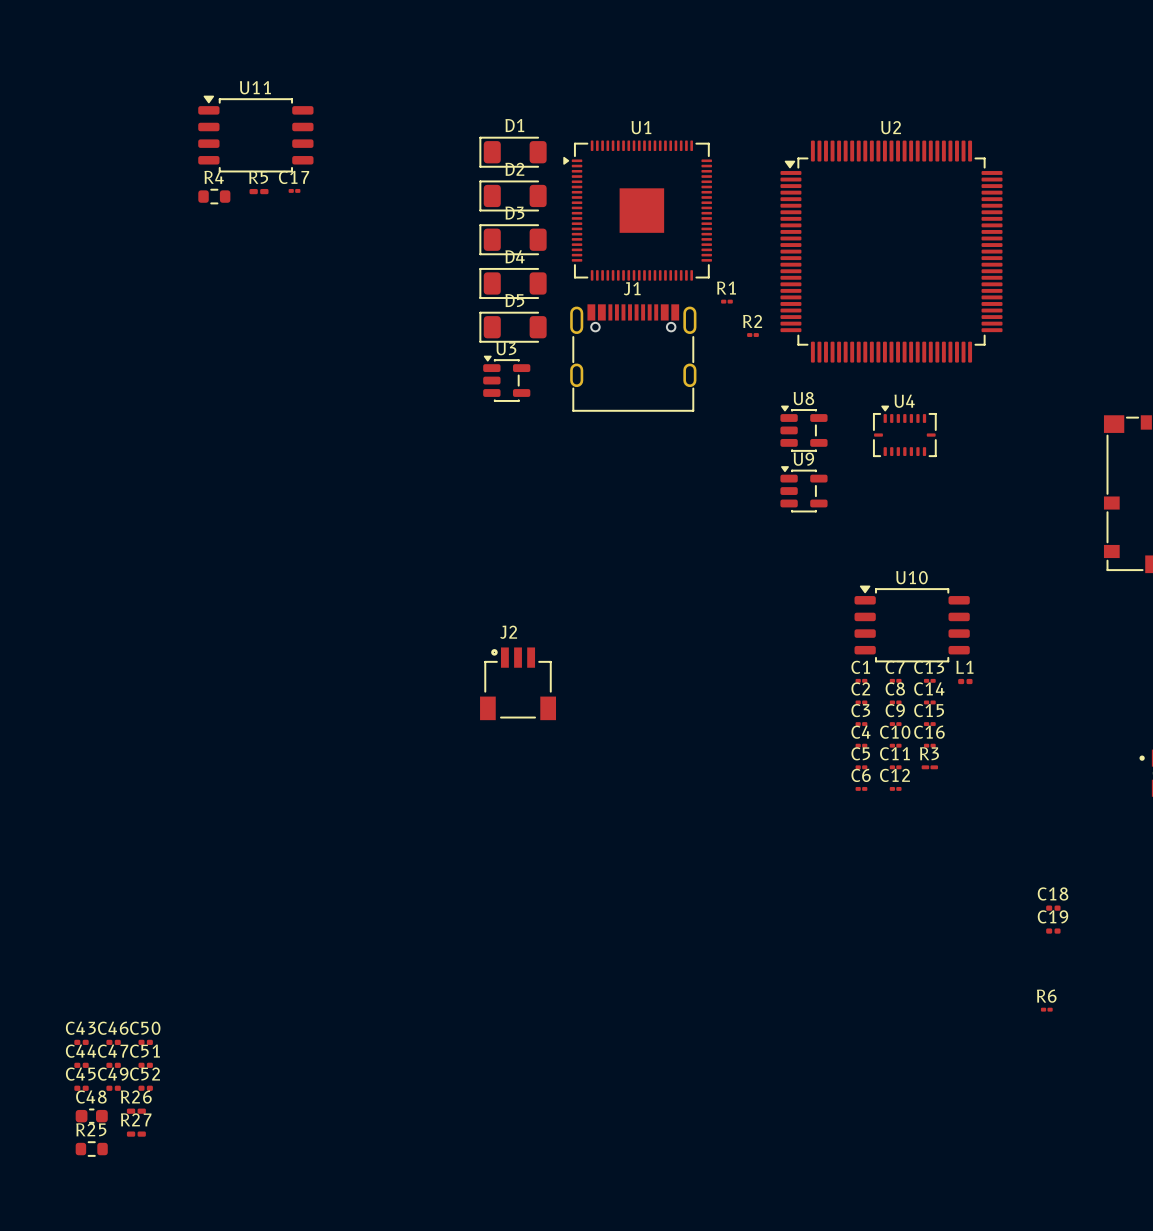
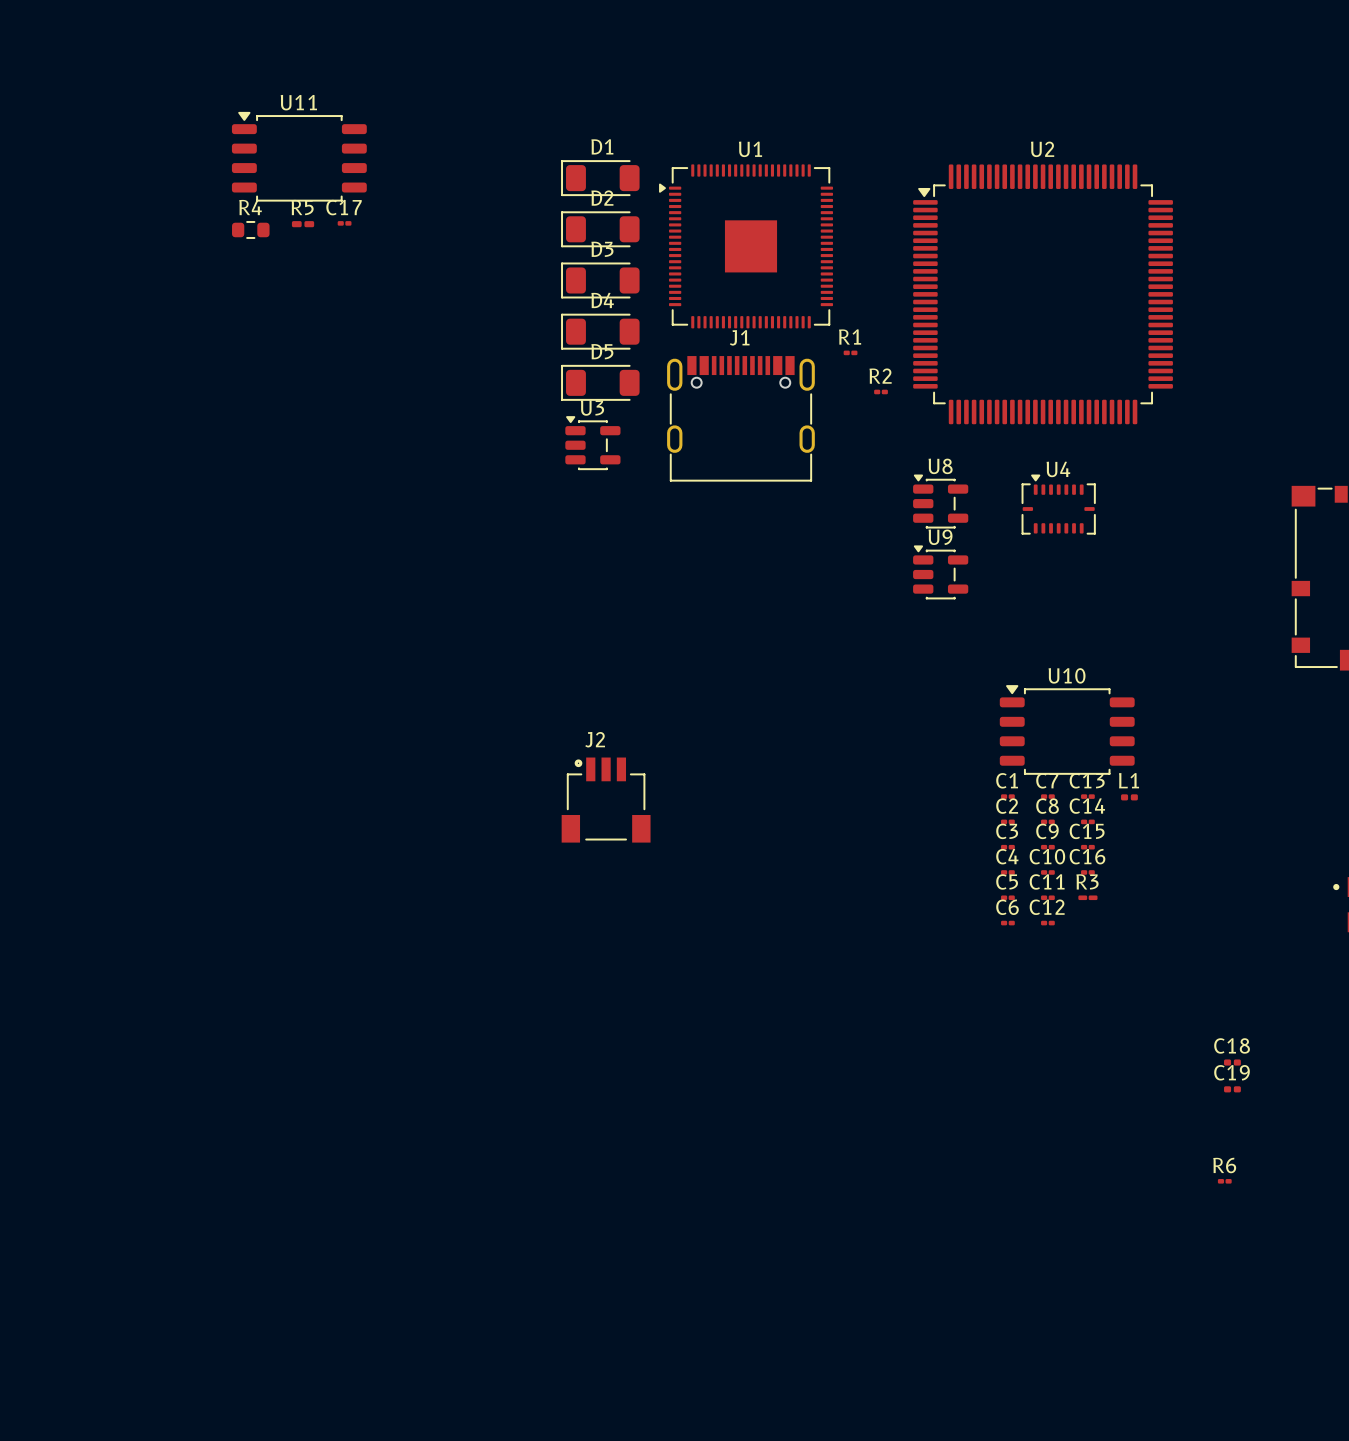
C43: (81, 1042) -> none
C46: (113, 1042) -> none
C50: (145, 1042) -> none
C44: (81, 1065) -> none
C47: (113, 1065) -> none
C51: (145, 1065) -> none
C45: (81, 1088) -> none
C49: (113, 1088) -> none
C52: (145, 1088) -> none
R26: (136, 1111) -> none
C48: (91, 1116) -> none
R27: (136, 1134) -> none
R25: (91, 1149) -> none

